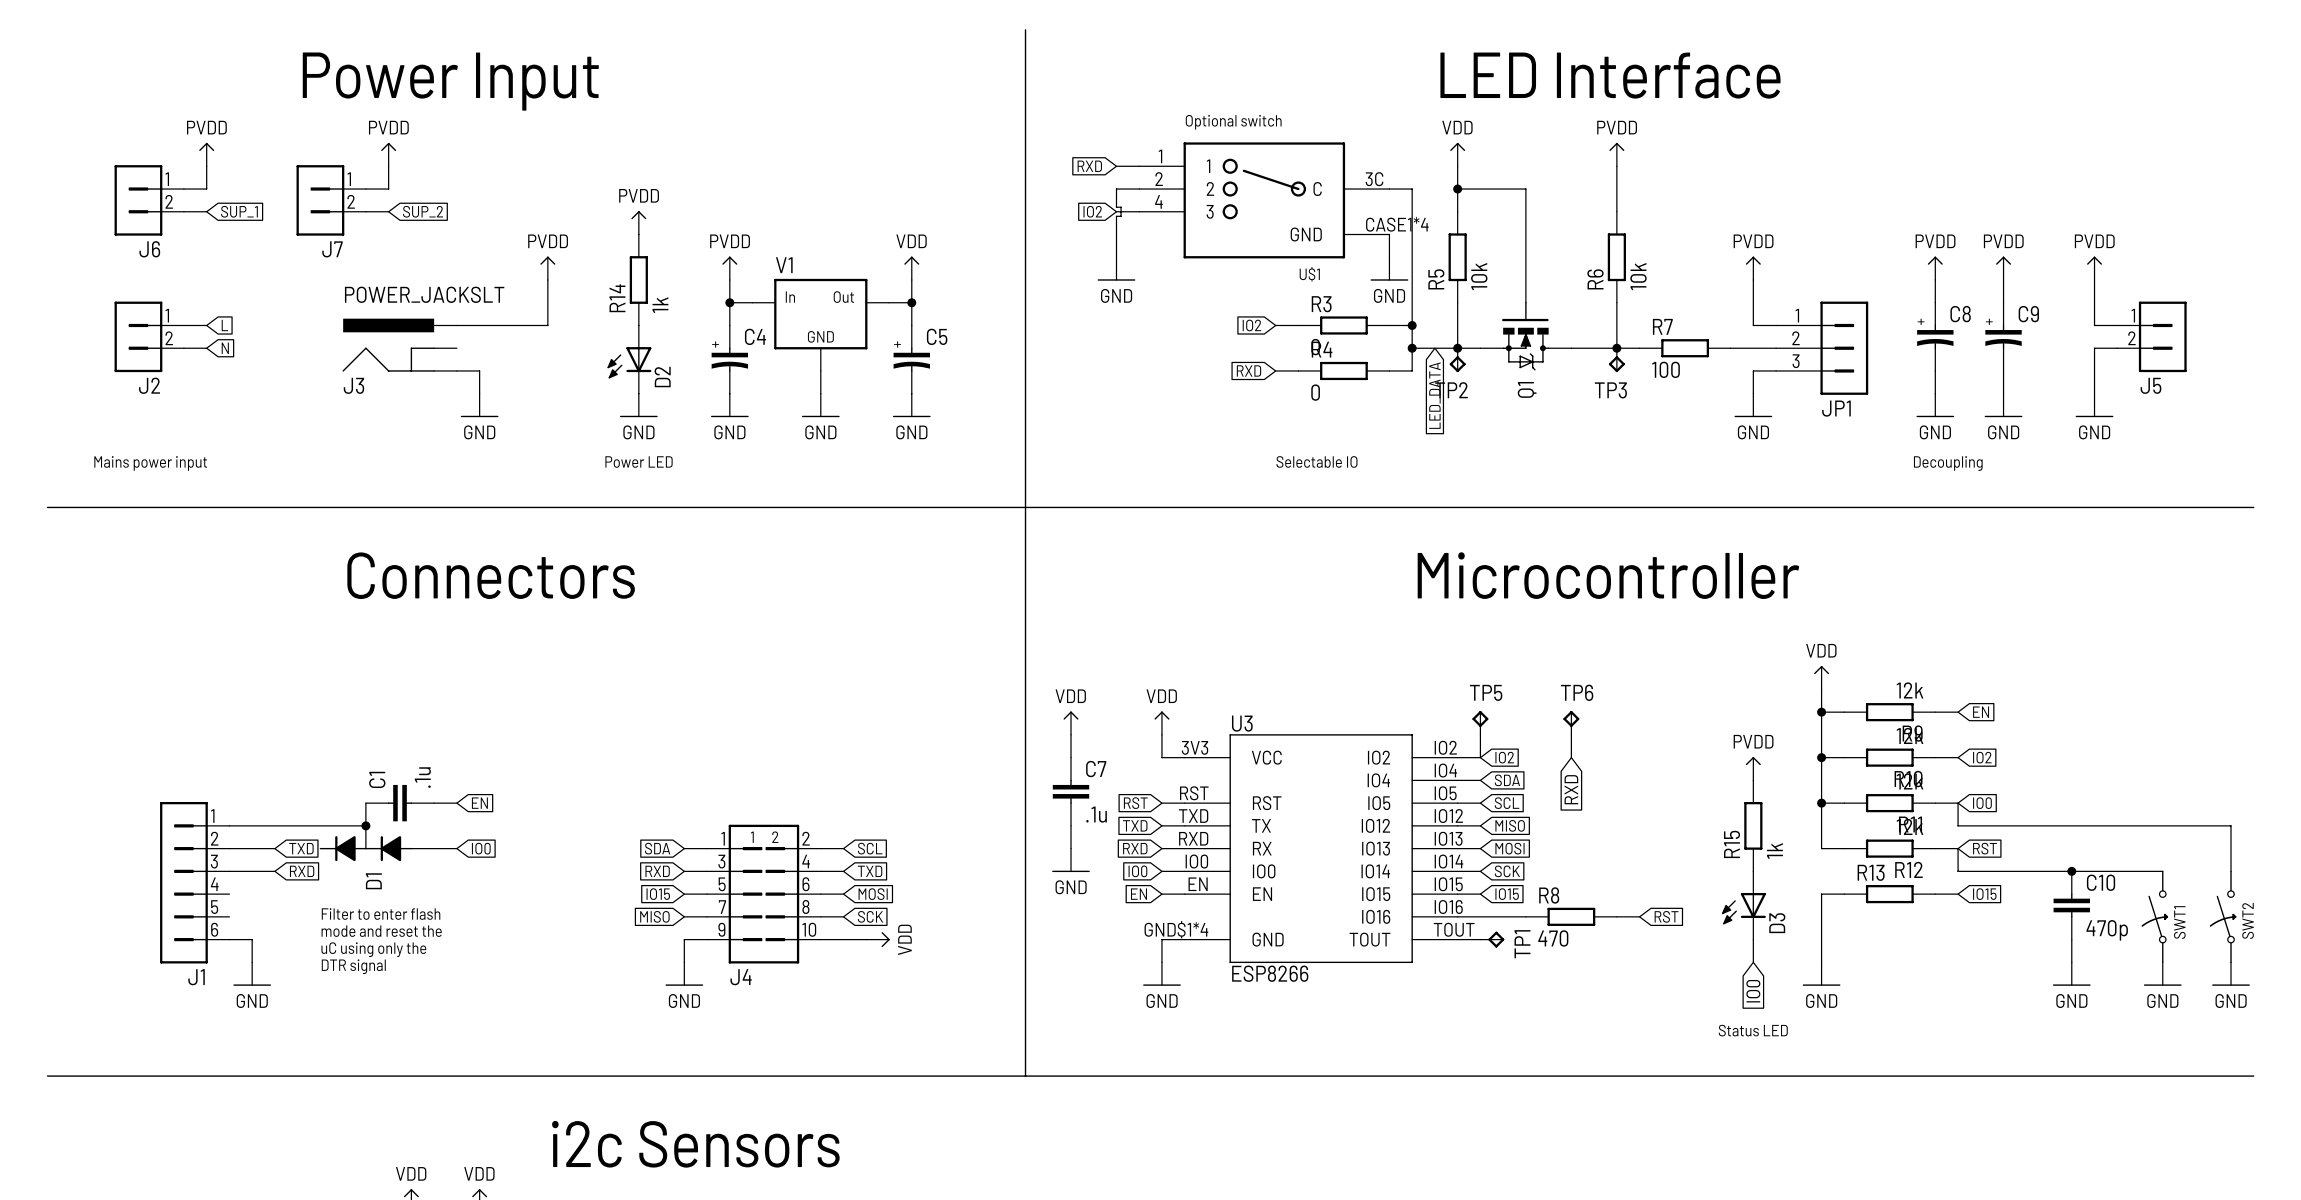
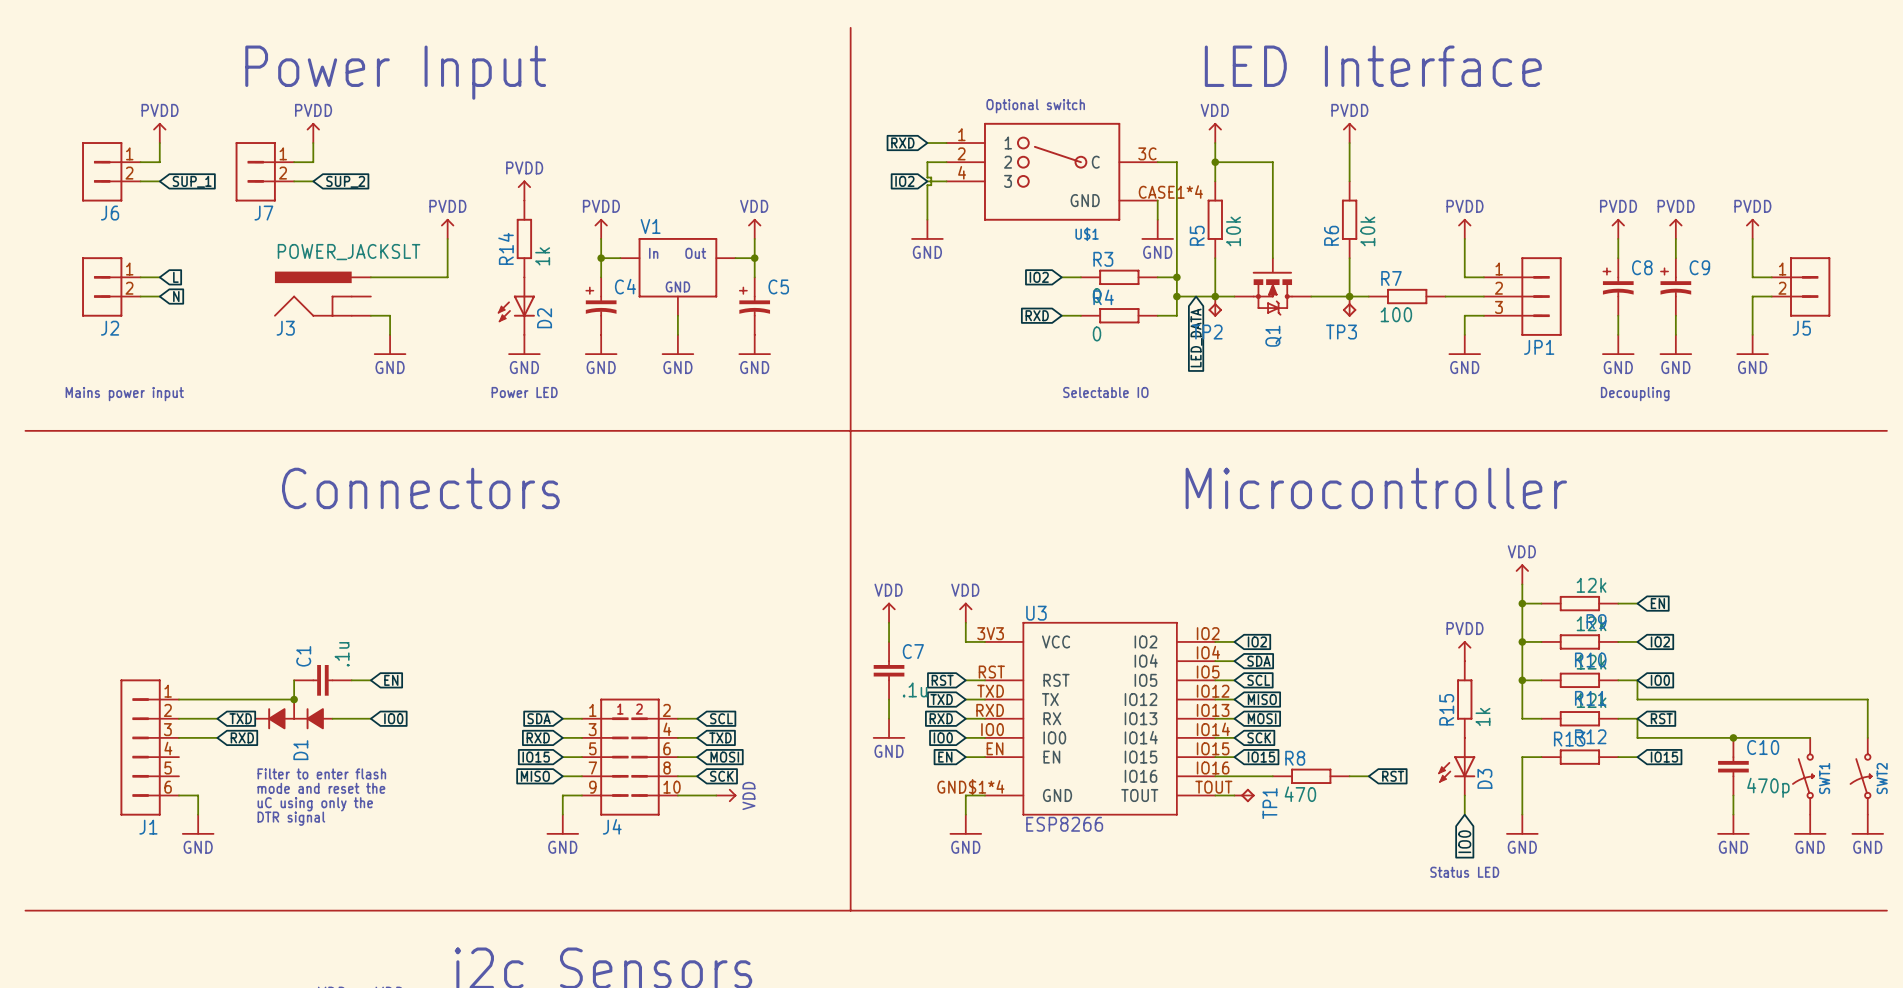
TP5: (1480, 722) -> none
TP6: (1571, 722) -> none
wire: (1480, 734) (1480, 757) -> none
wire: (1571, 734) (1571, 757) -> none
global label: RXD (1571, 789) -> none

